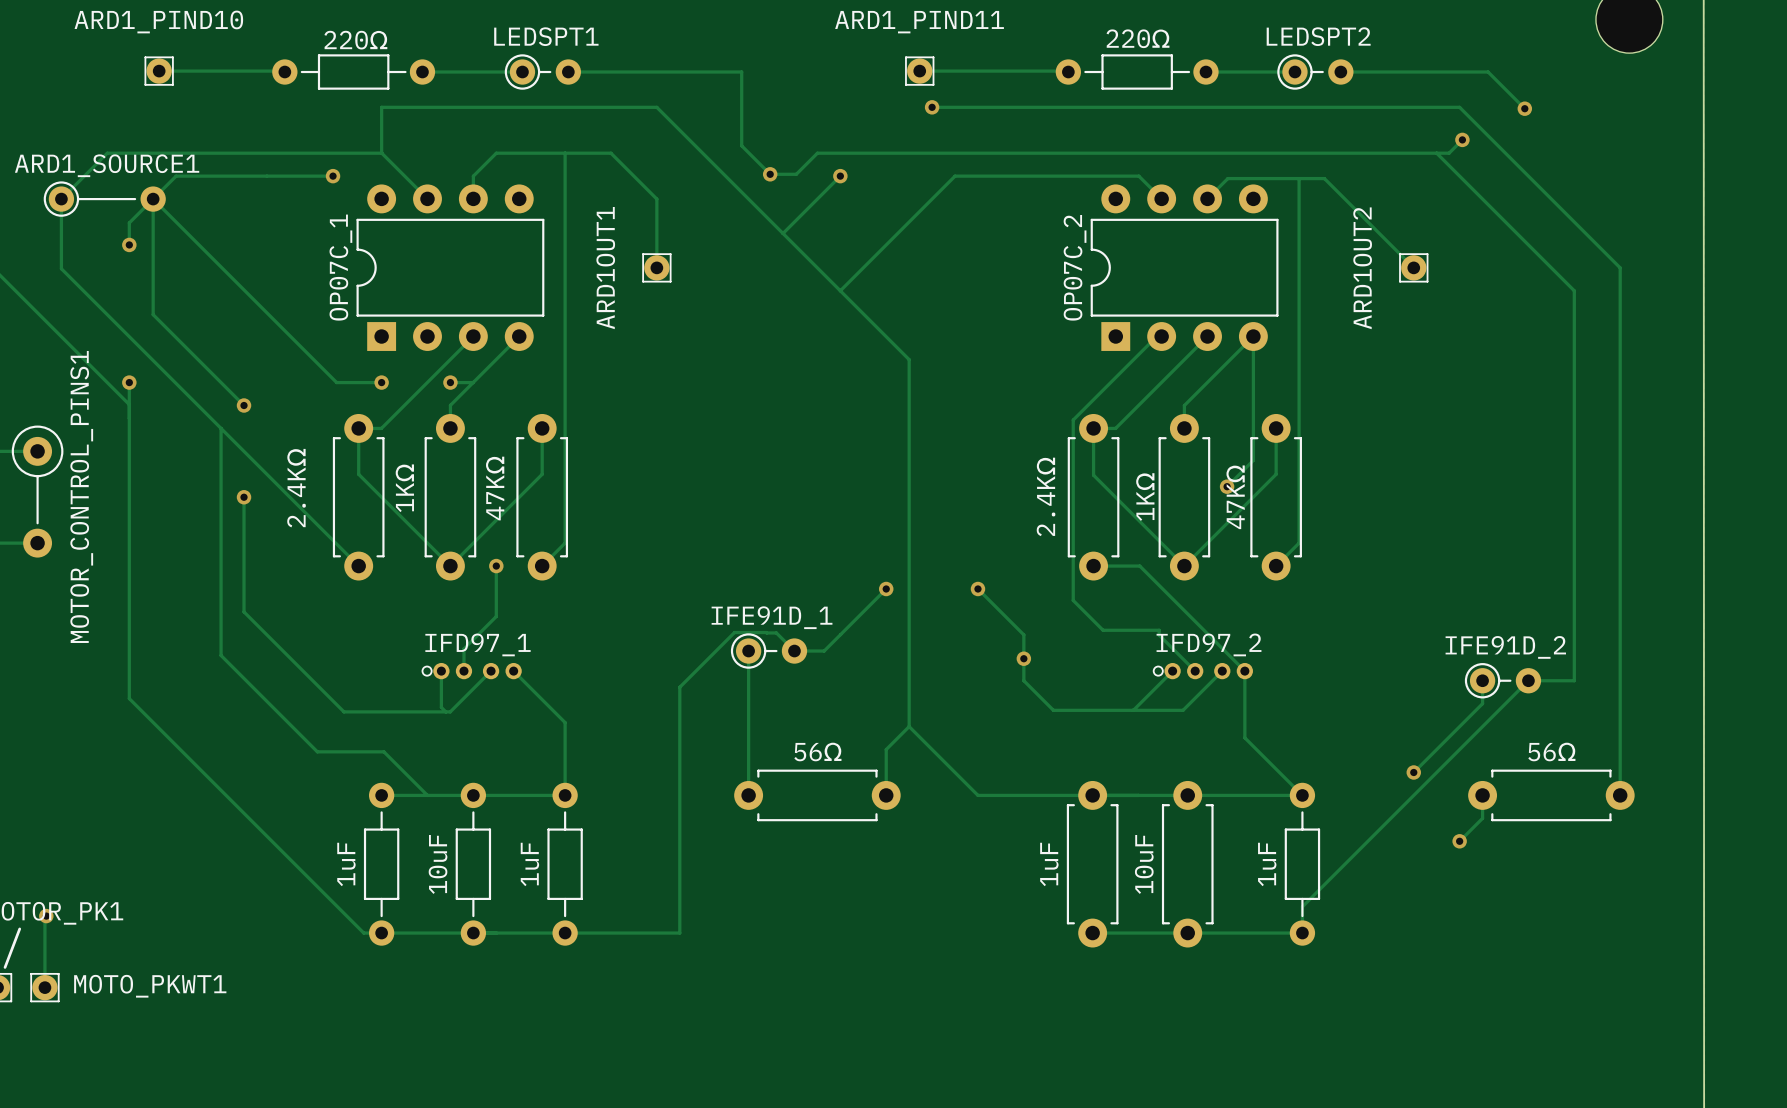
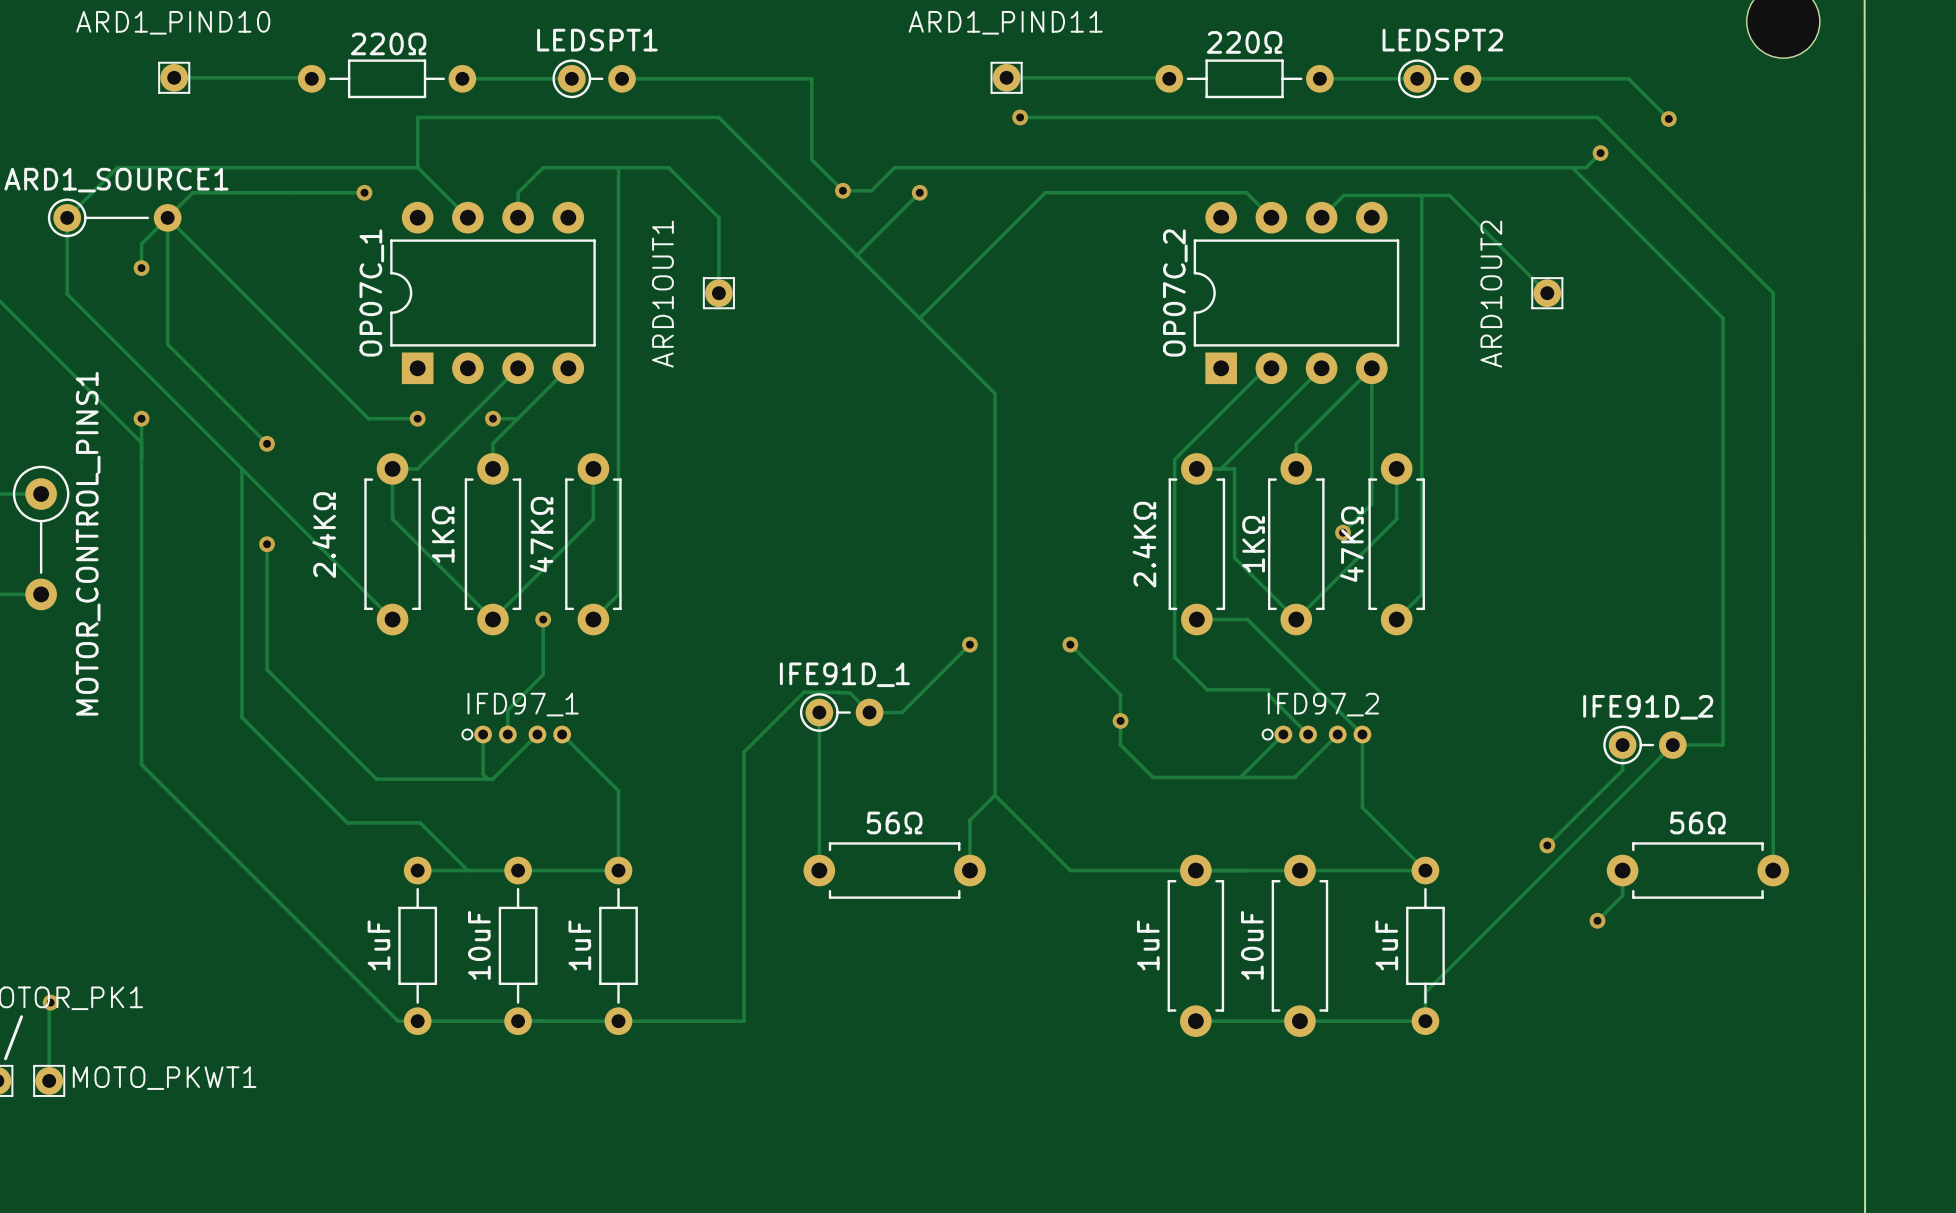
track: (1093, 428) (1093, 475) (1128, 509) -> (1220, 468) (1234, 468) (1234, 557)

